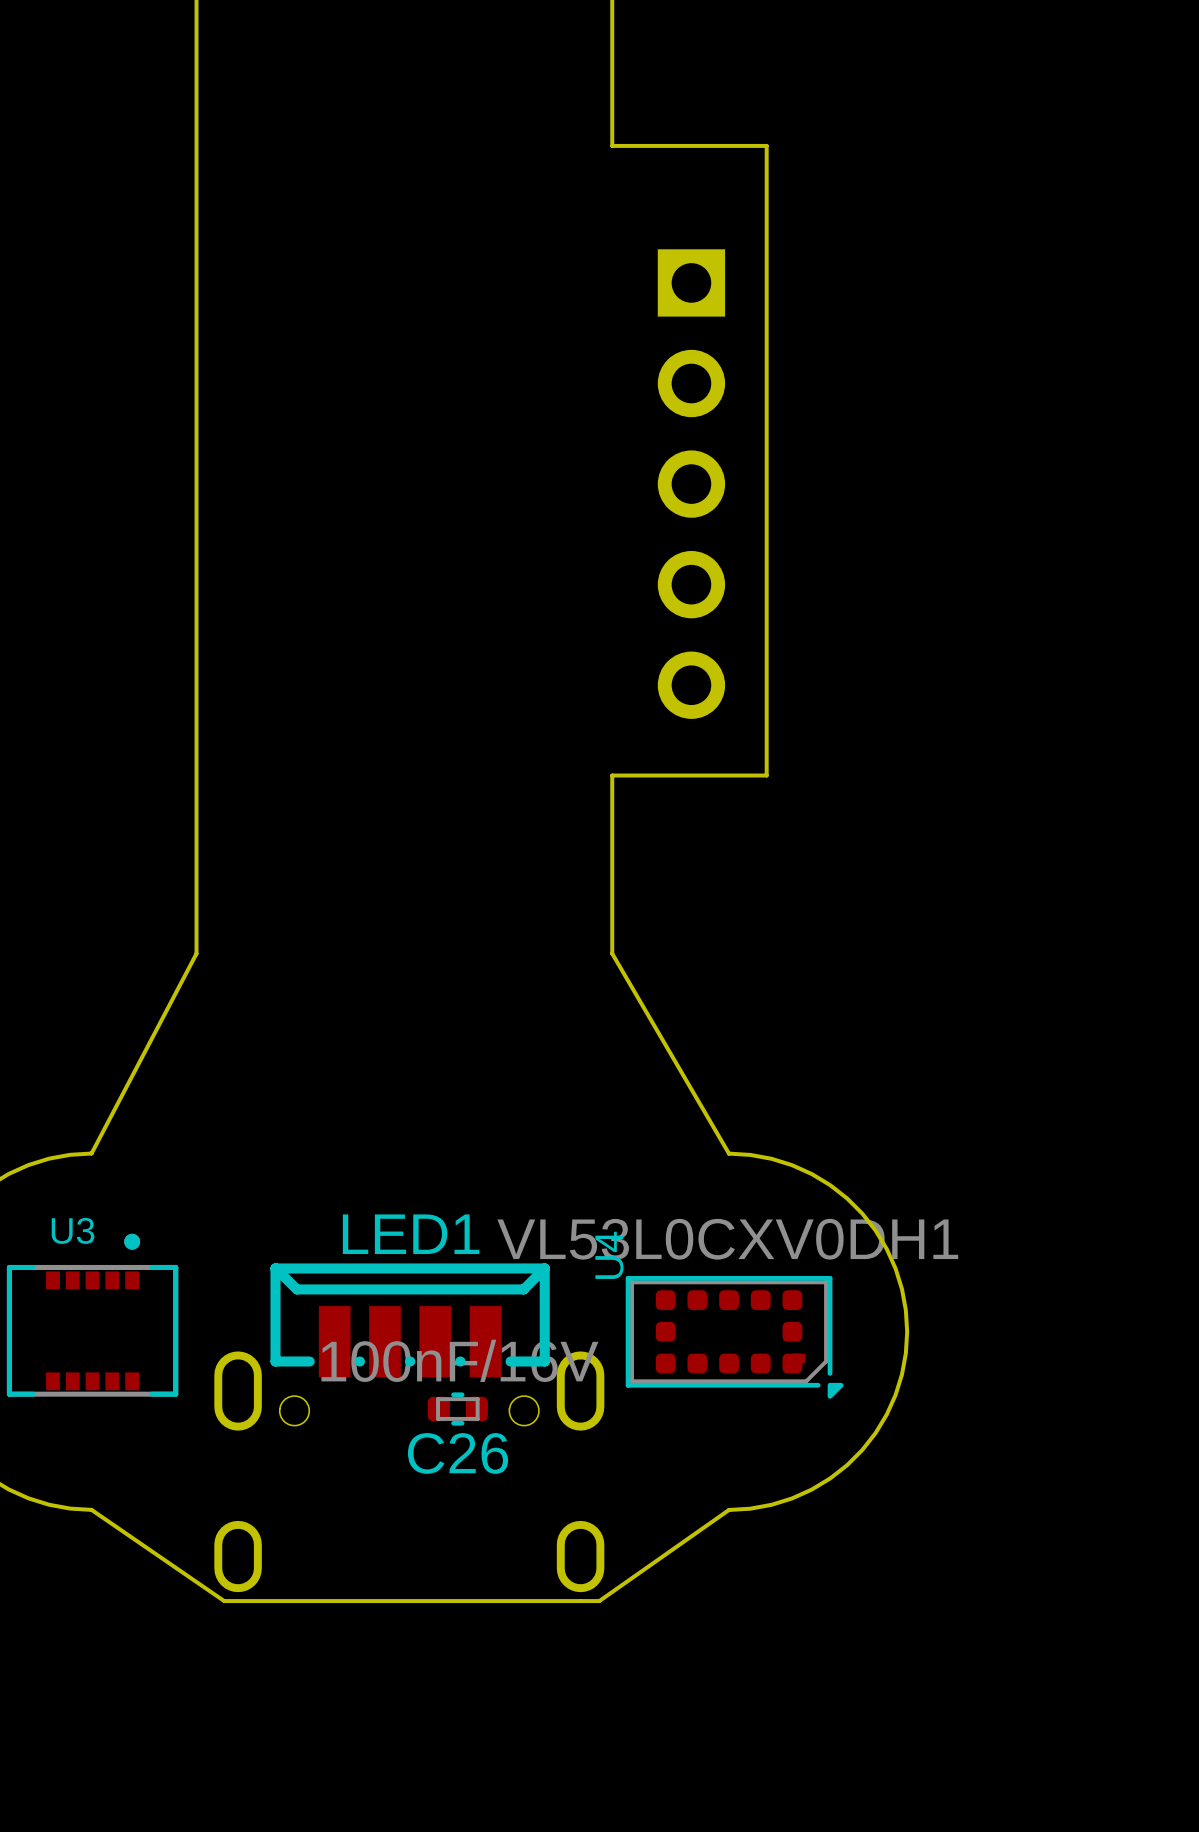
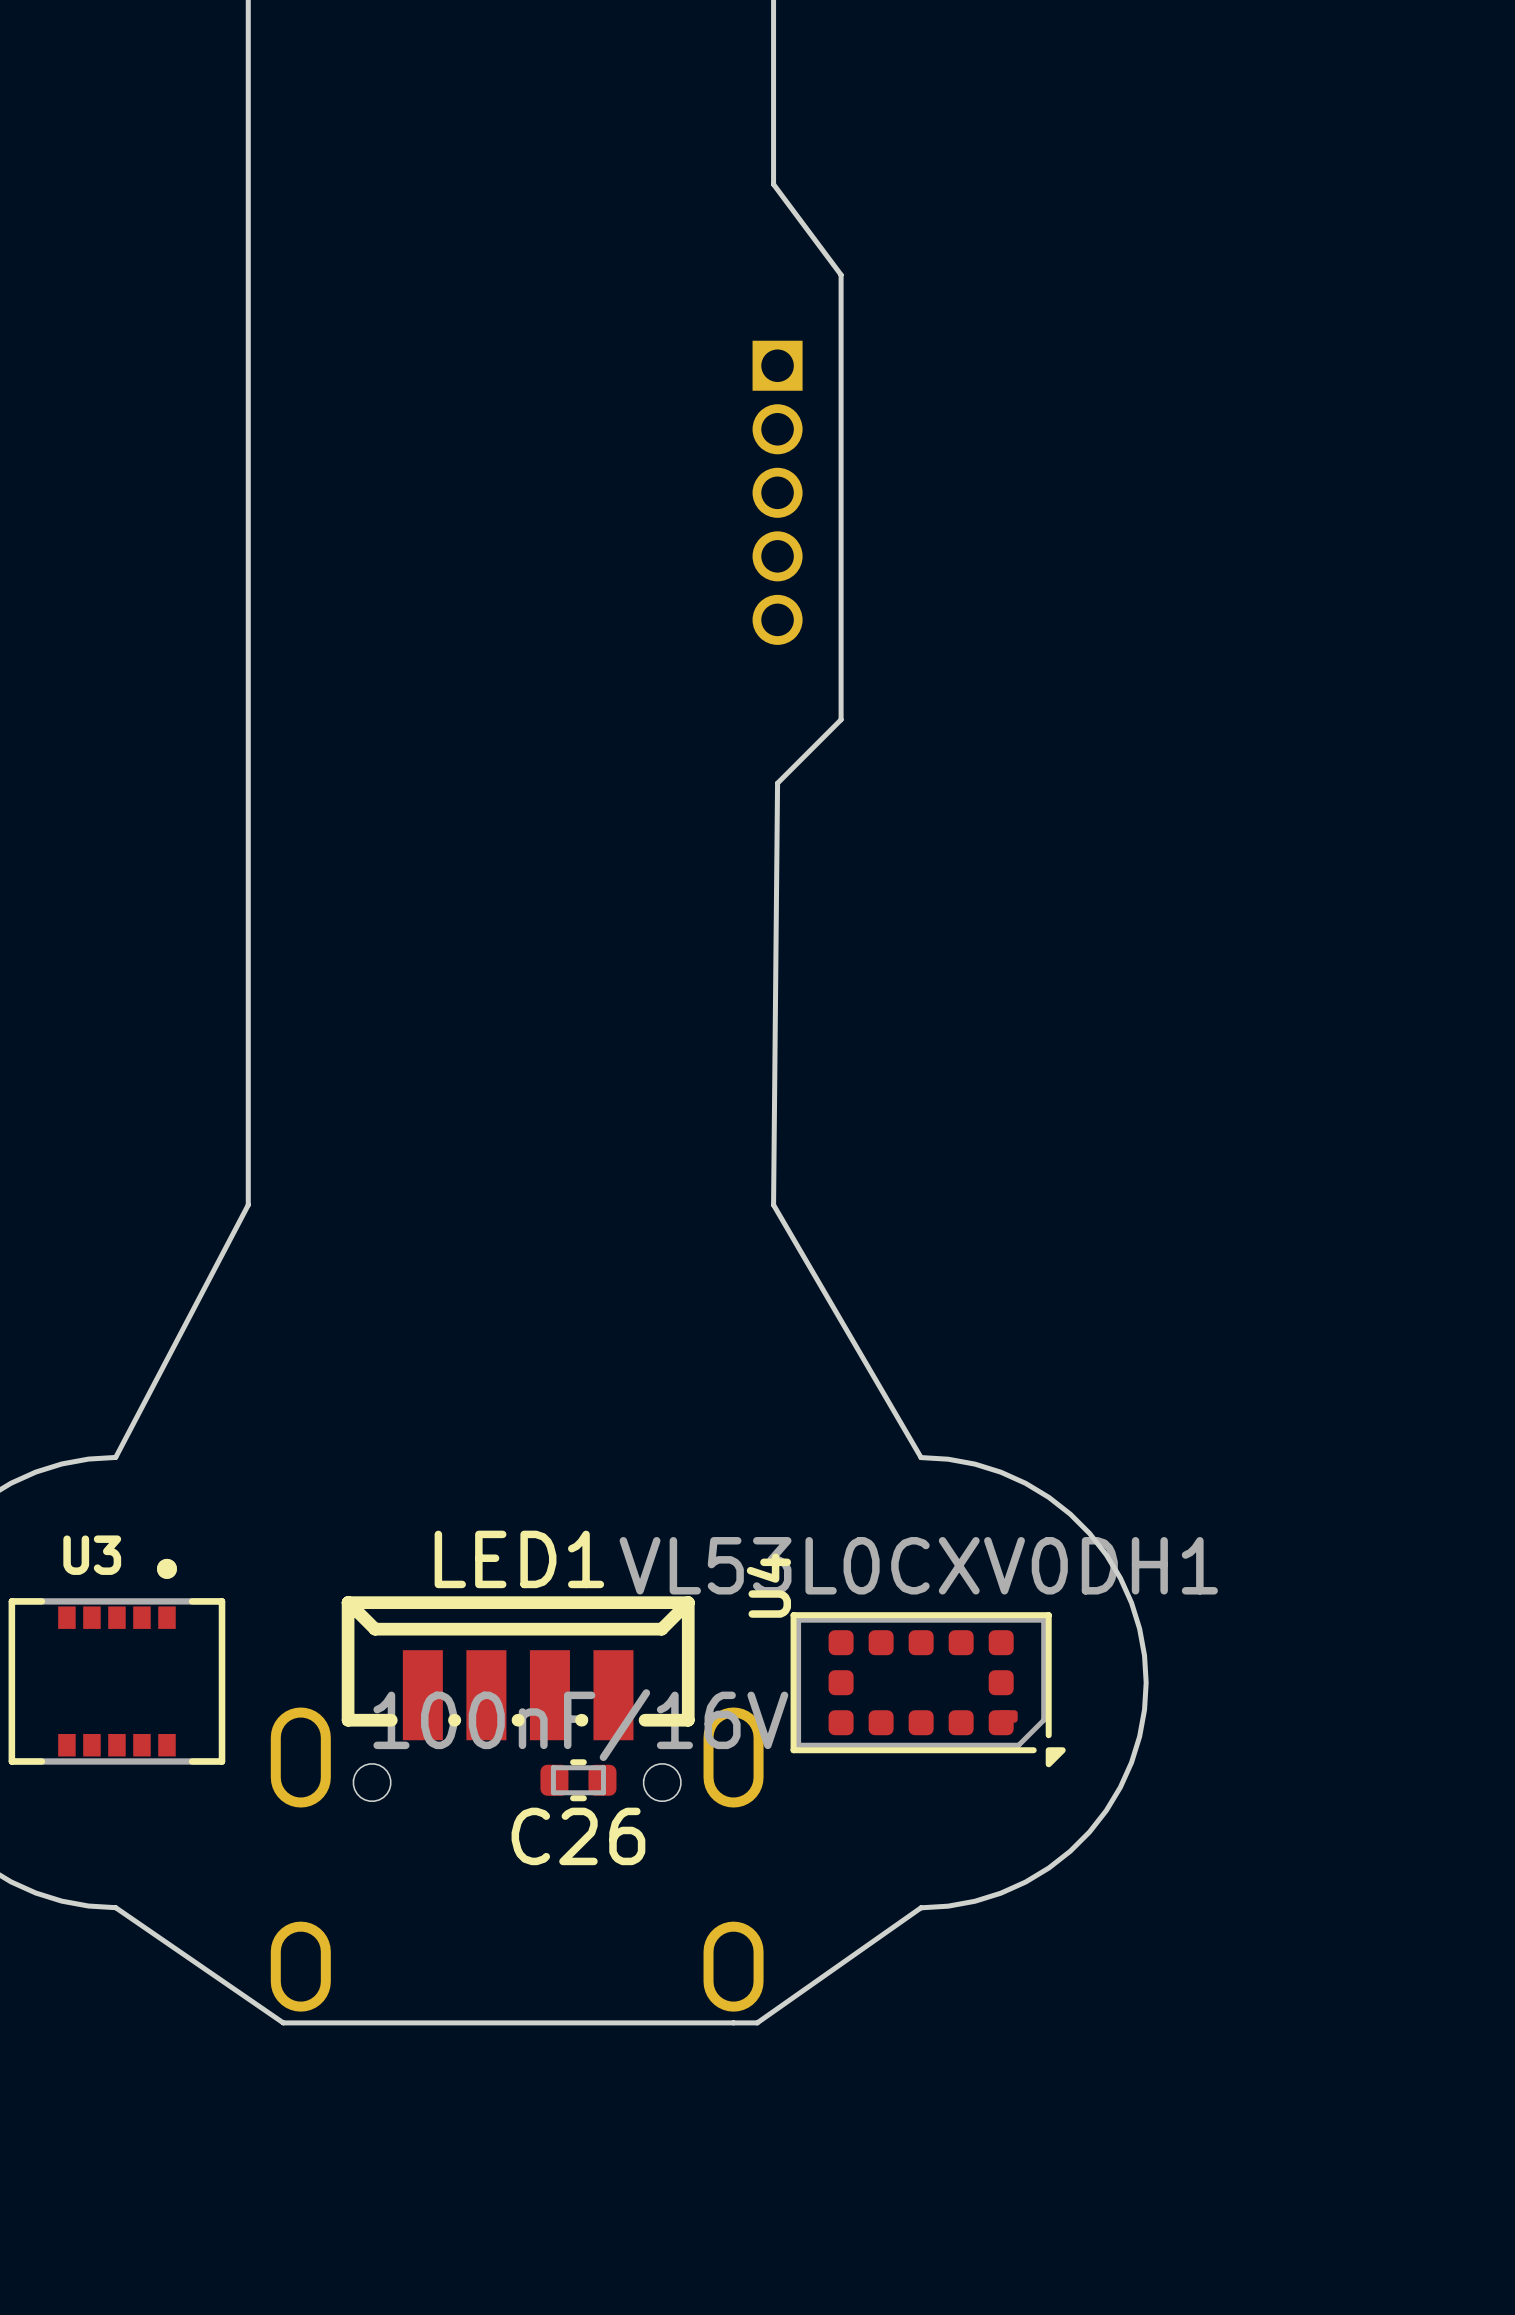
board edge: (612, 145) (766, 145) (766, 775) (612, 775) (612, 953) -> (773, 184) (841, 274) (841, 719) (777, 783) (773, 1204)
part: none -> (777, 492)
part: (691, 484) -> none

